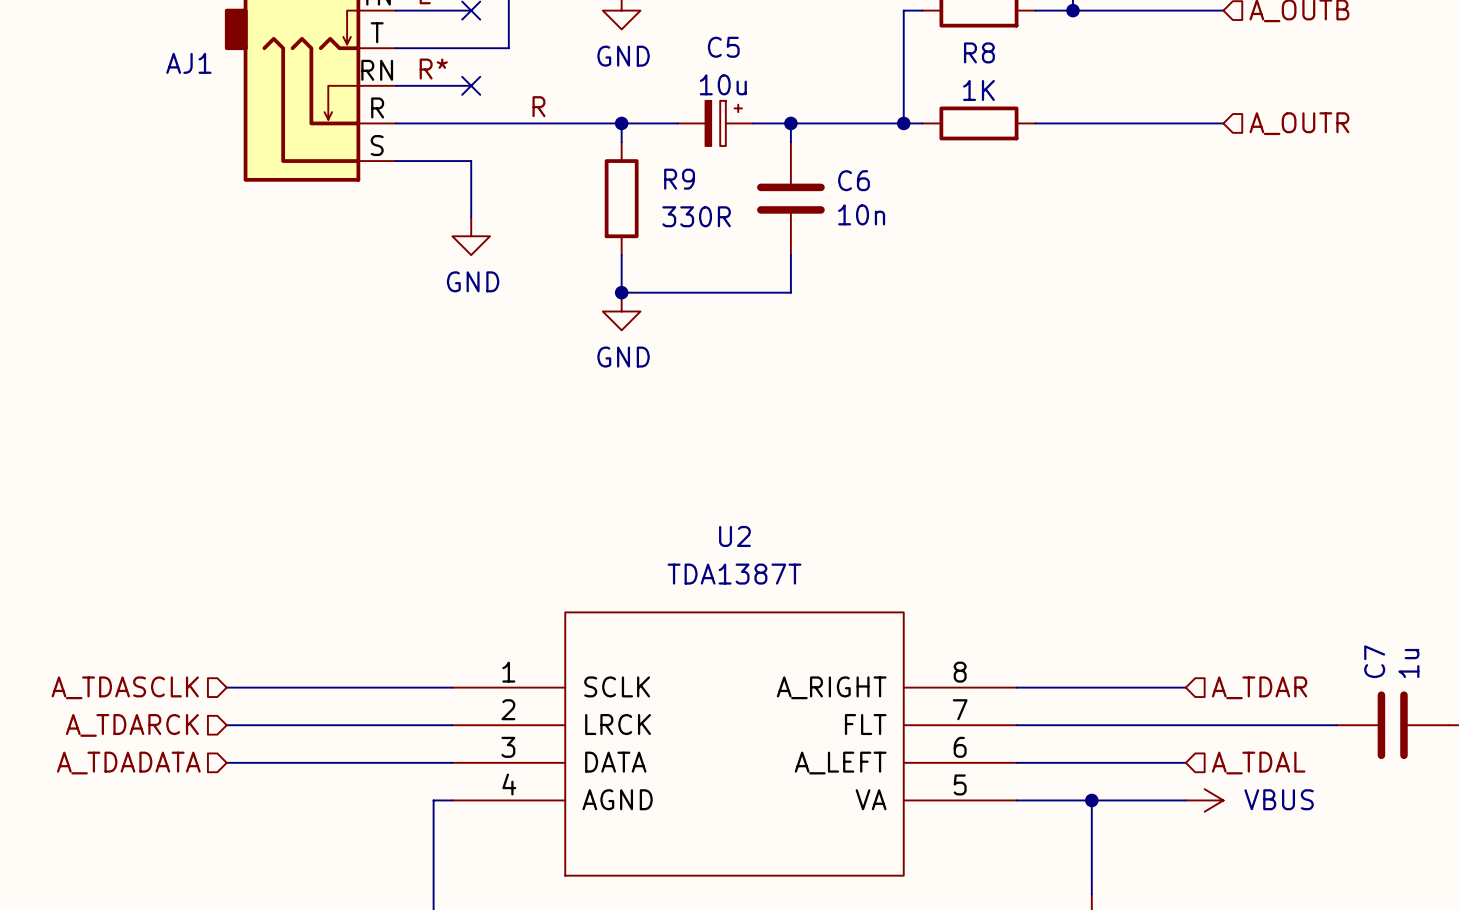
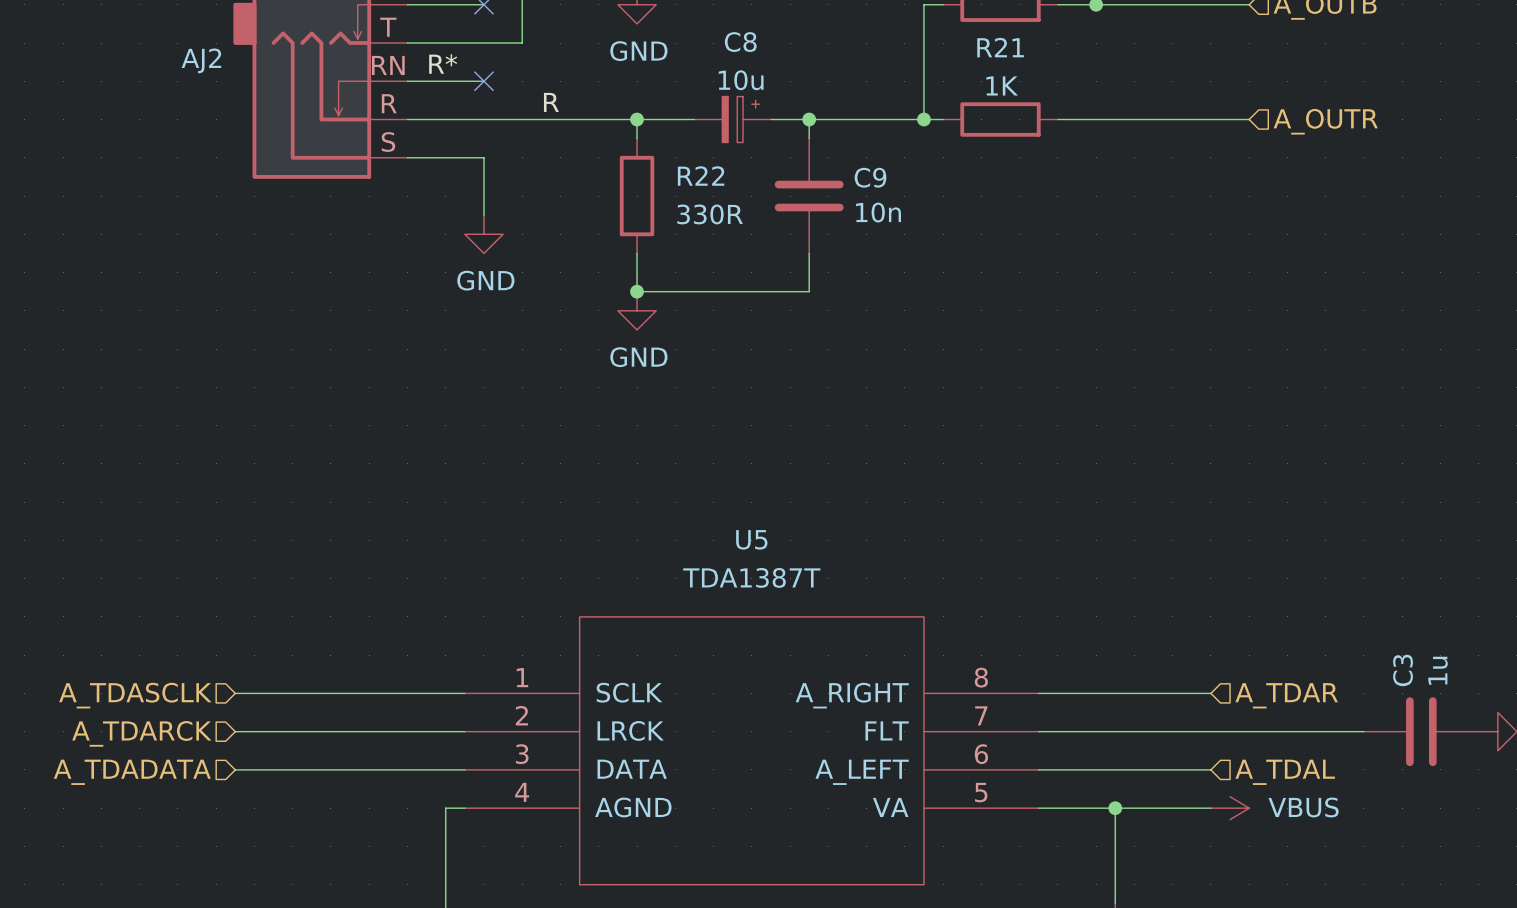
C5 name: C5 (723, 47) -> C8 (740, 42)
R8 name: R8 (979, 52) -> R21 (1000, 47)
AJ1 name: AJ1 (188, 63) -> AJ2 (201, 60)
R9 name: R9 (679, 179) -> R22 (701, 176)
C6 name: C6 (854, 180) -> C9 (870, 177)
U2 name: U2 (734, 536) -> U5 (751, 539)
C7 name: C7 (1374, 661) -> C3 (1403, 670)

